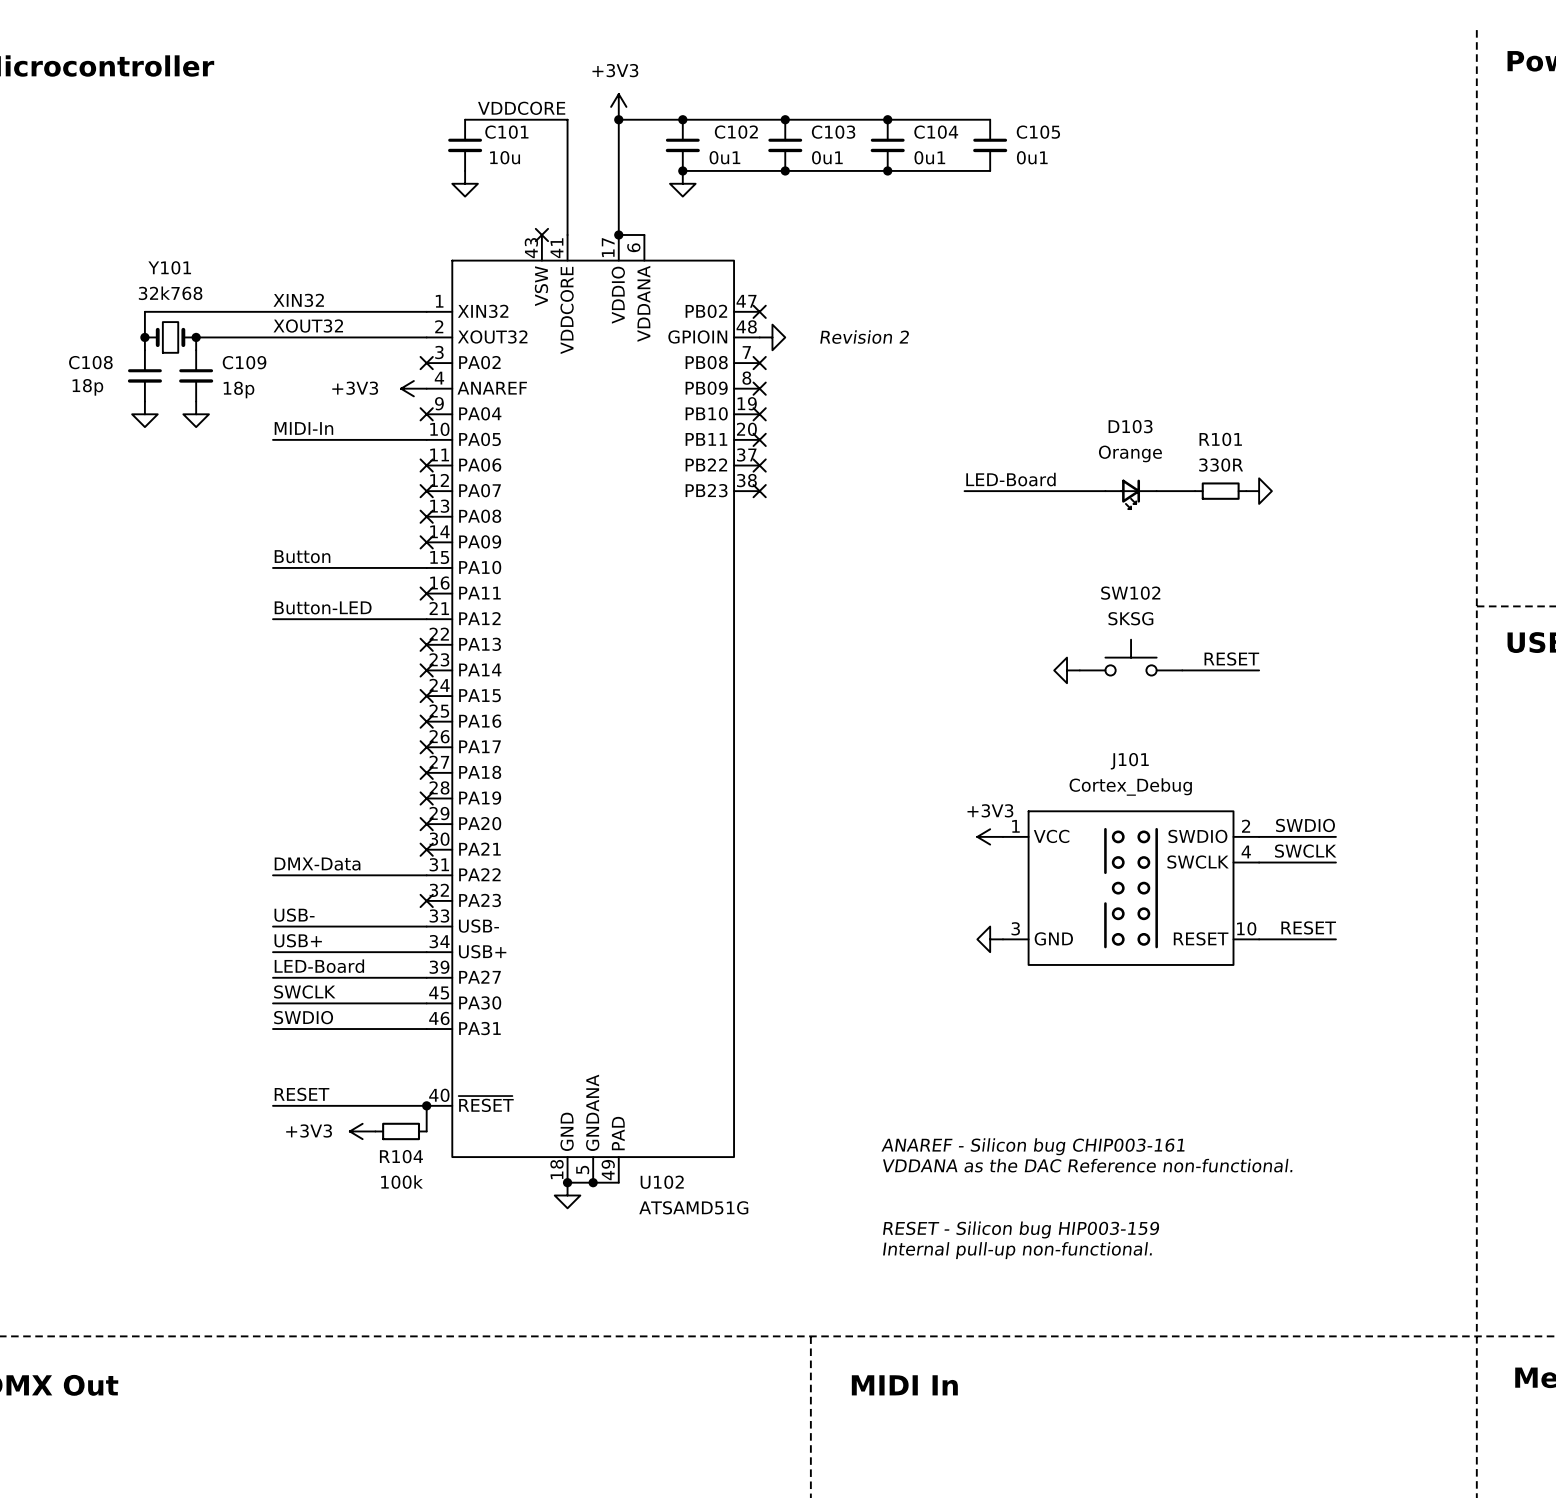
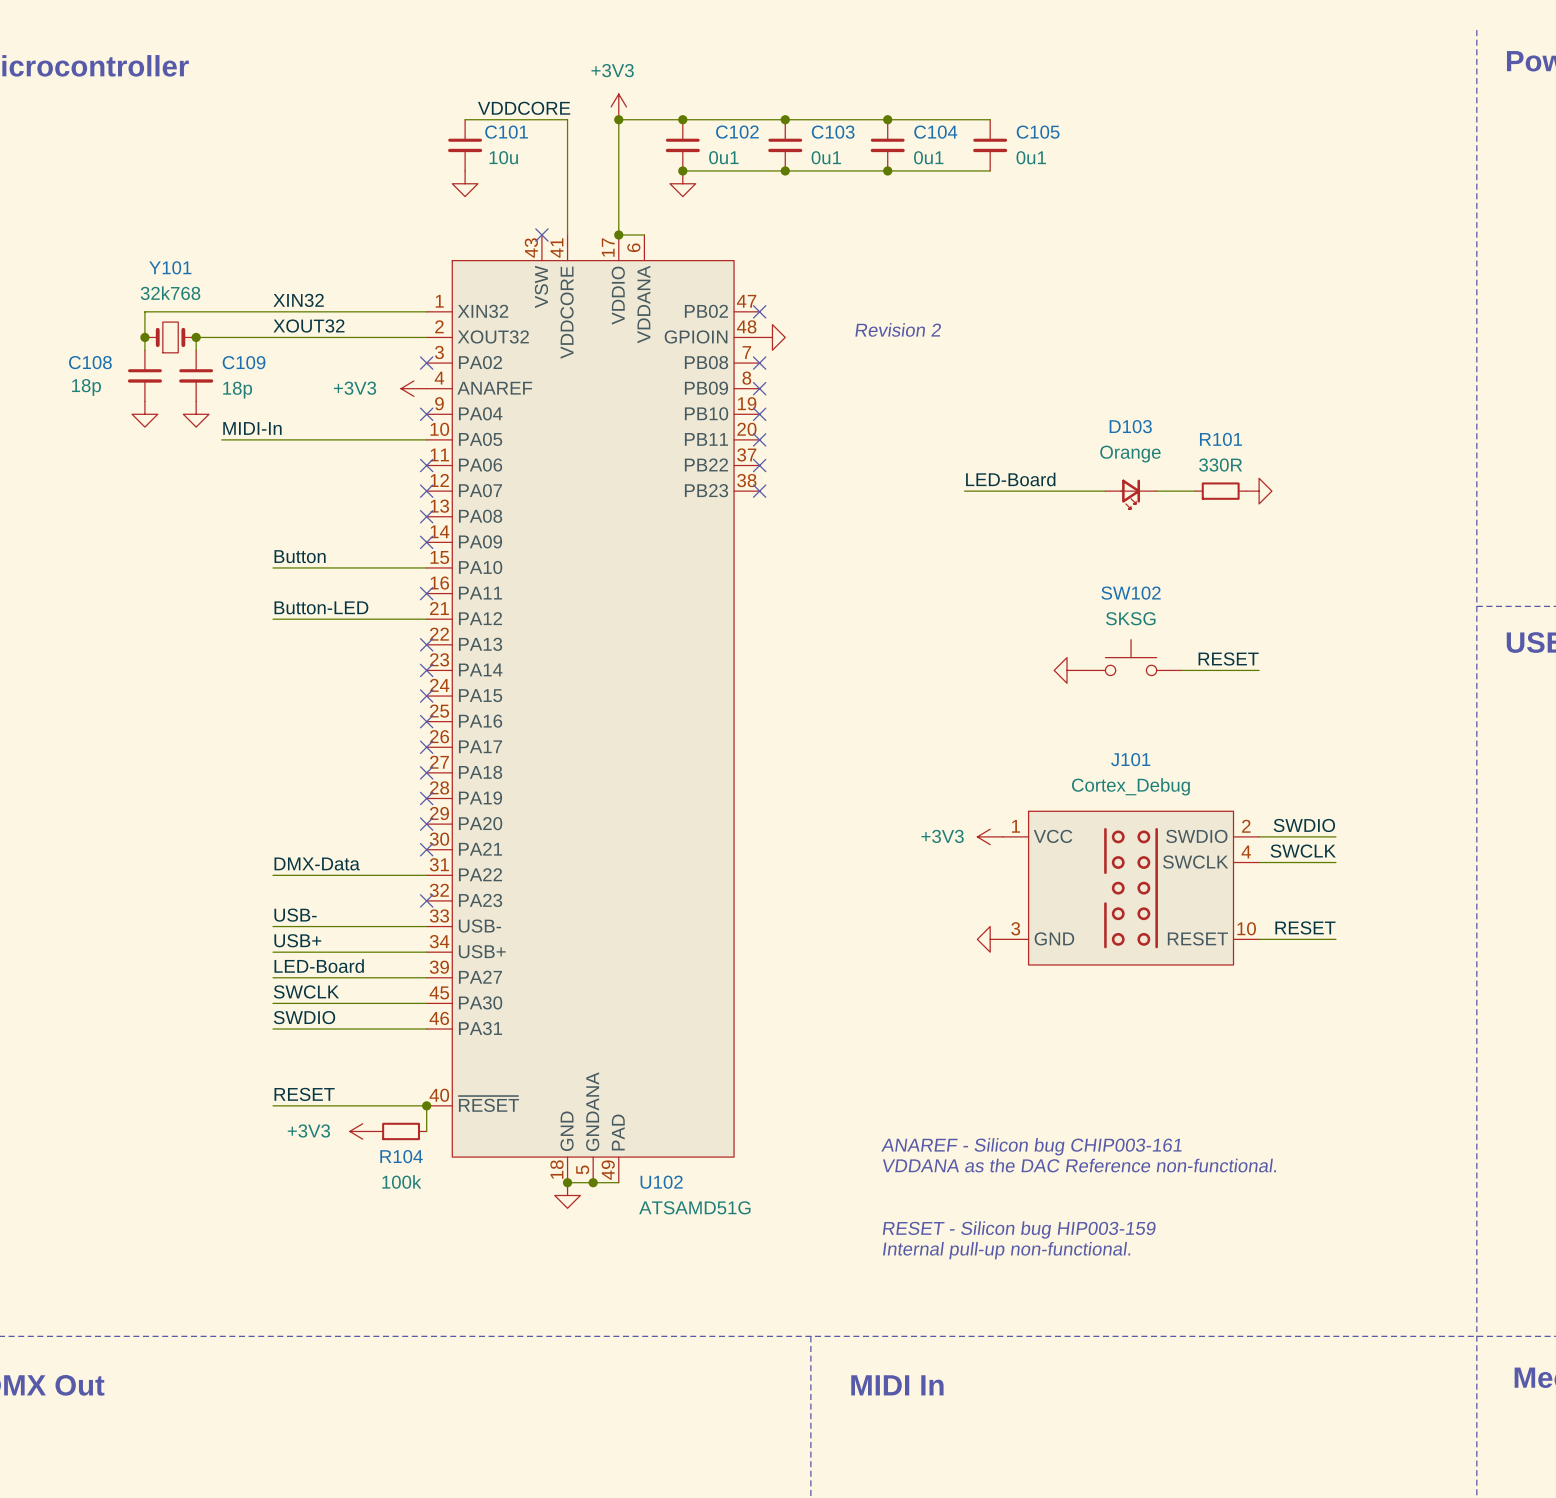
text position: Revision 2 (864, 337) -> Revision 2 (898, 329)
label position: MIDI-In (303, 428) -> MIDI-In (252, 428)
wire: none -> (221, 439) (273, 439)
power symbol text position: +3V3 (990, 810) -> +3V3 (942, 836)

